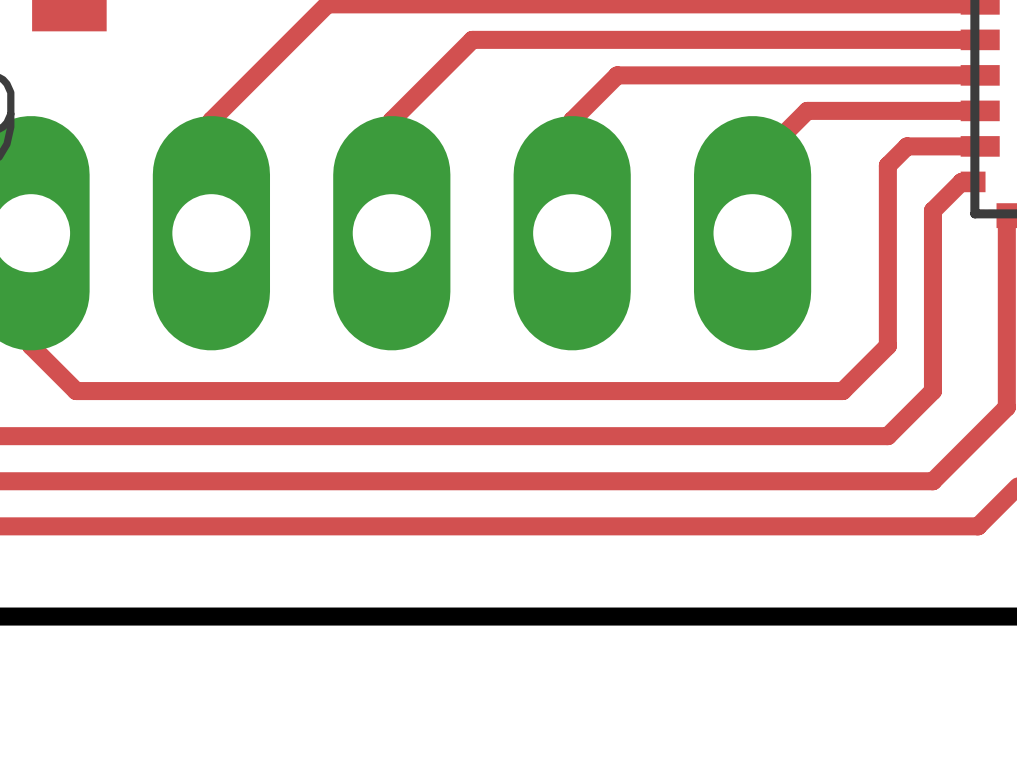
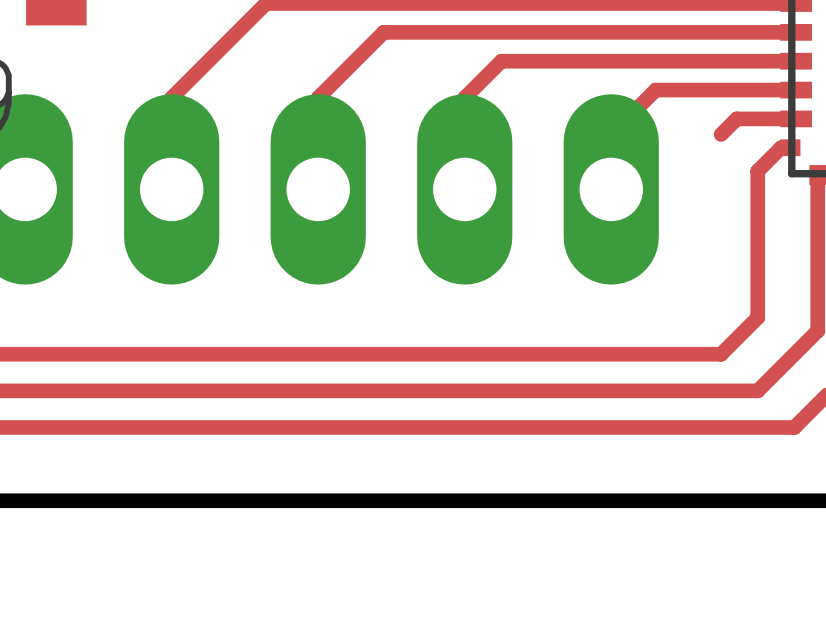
track: (887, 165) (887, 345) (842, 391) (76, 391) (31, 345) (31, 233) -> none

